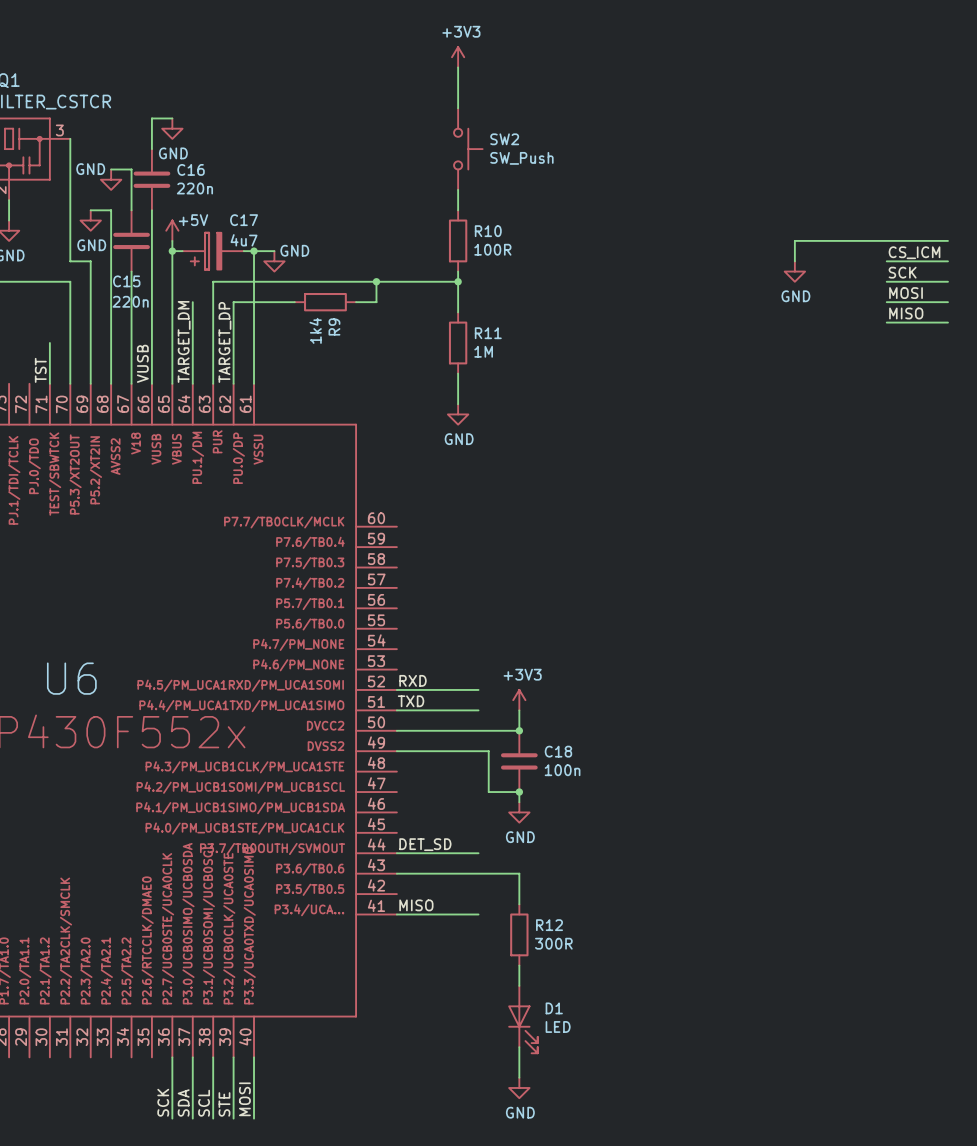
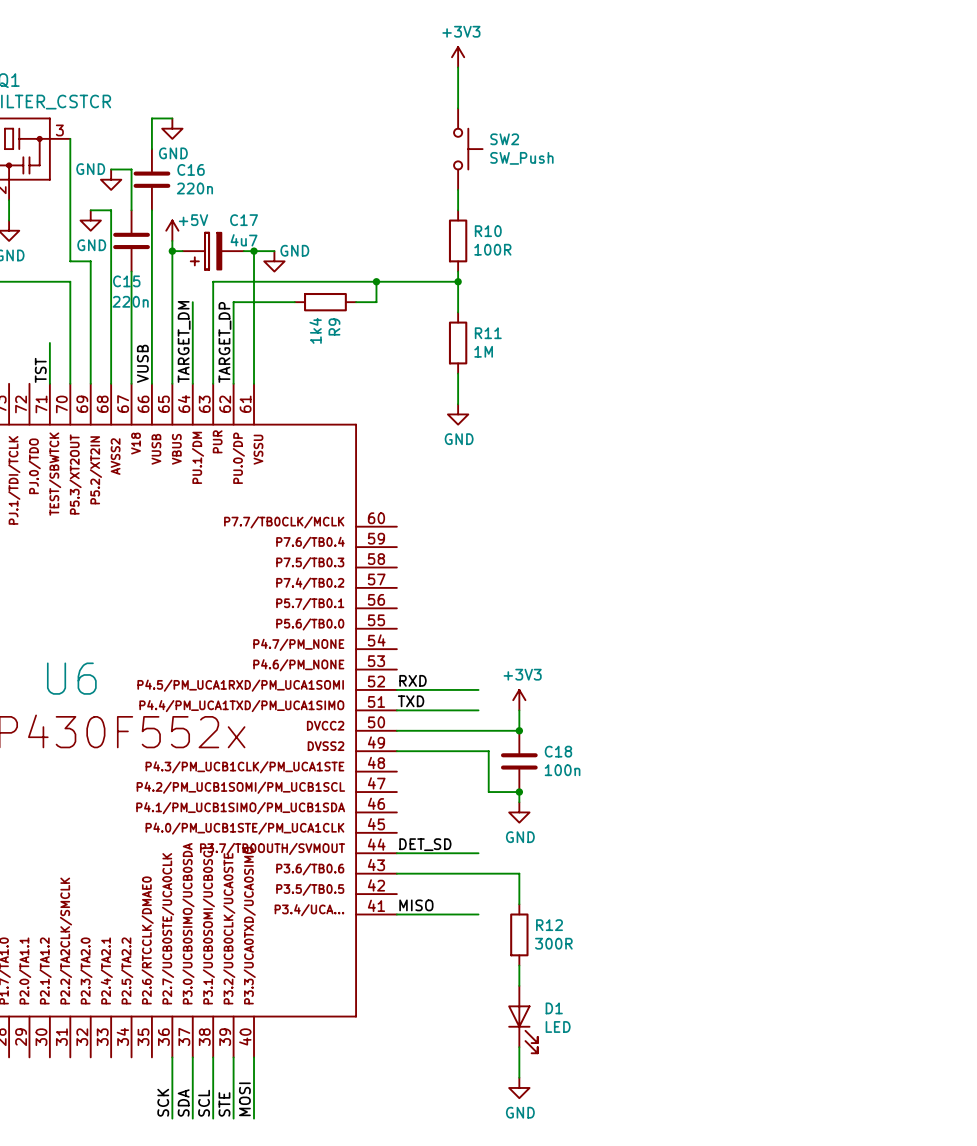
wire: (947, 240) (794, 240) (794, 261) -> none
label: CS_ICM (914, 252) -> none
wire: (886, 261) (947, 261) -> none
power symbol: GND (794, 271) -> none
label: SCK (902, 272) -> none
wire: (886, 281) (947, 281) -> none
label: MOSI (906, 293) -> none
wire: (886, 302) (947, 302) -> none
label: MISO (906, 313) -> none
wire: (886, 322) (947, 322) -> none

